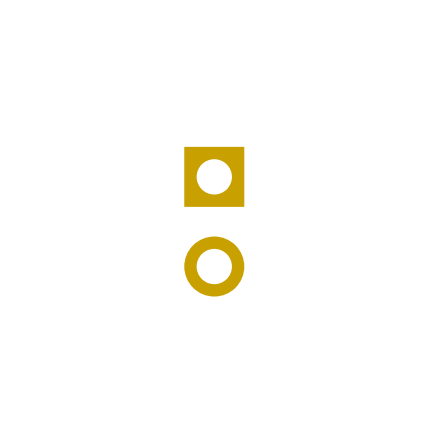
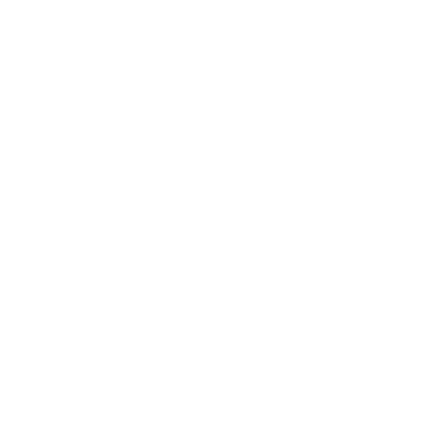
part: (214, 221) -> none

